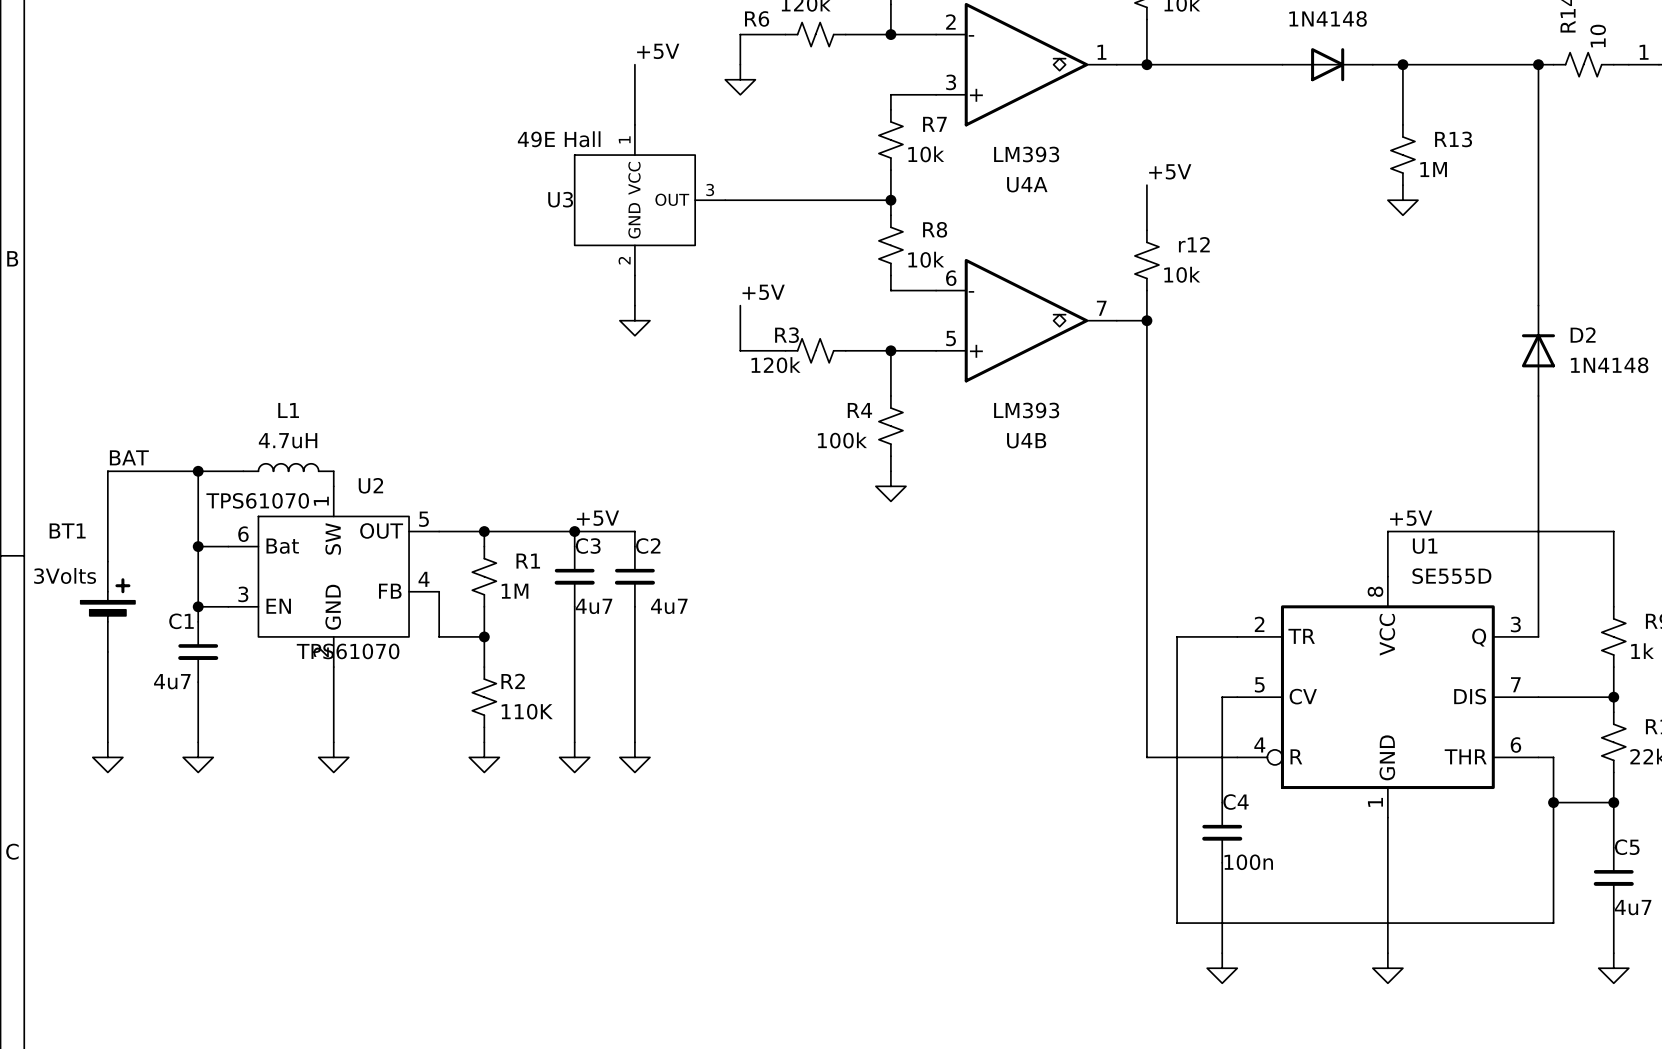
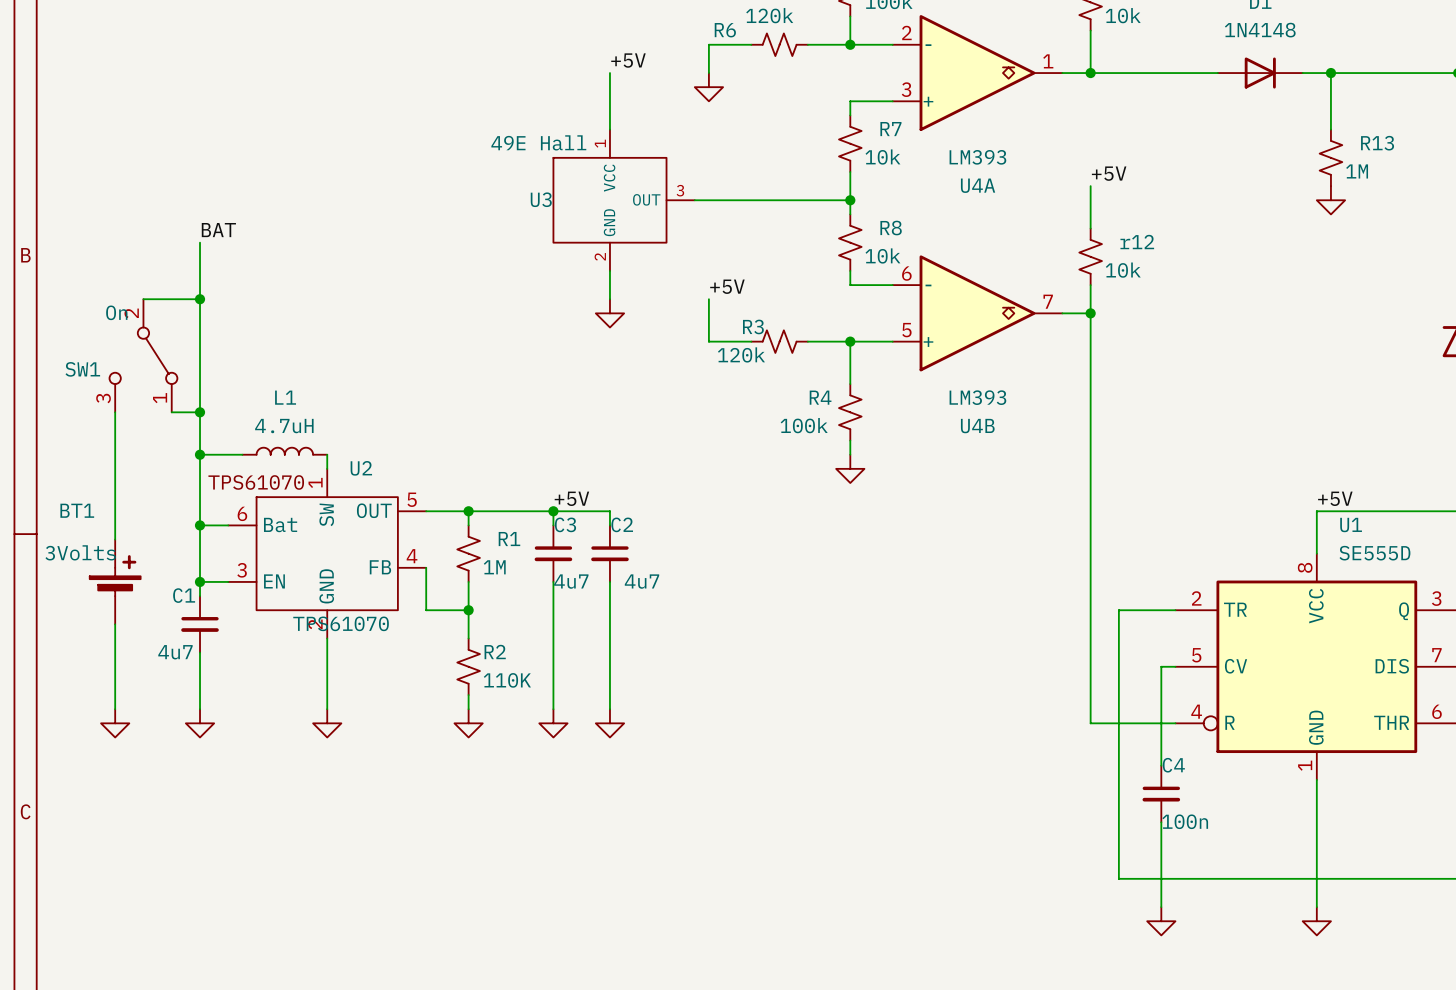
wire: none -> (200, 242) (200, 454)
wire: none -> (143, 299) (200, 299)
junction: none -> (200, 299)
SW1: none -> On (143, 355)
wire: none -> (171, 412) (200, 412)
junction: none -> (200, 412)
label position: BAT (129, 457) -> BAT (218, 230)
wire: (107, 471) (198, 471) -> (115, 454) (115, 412)

